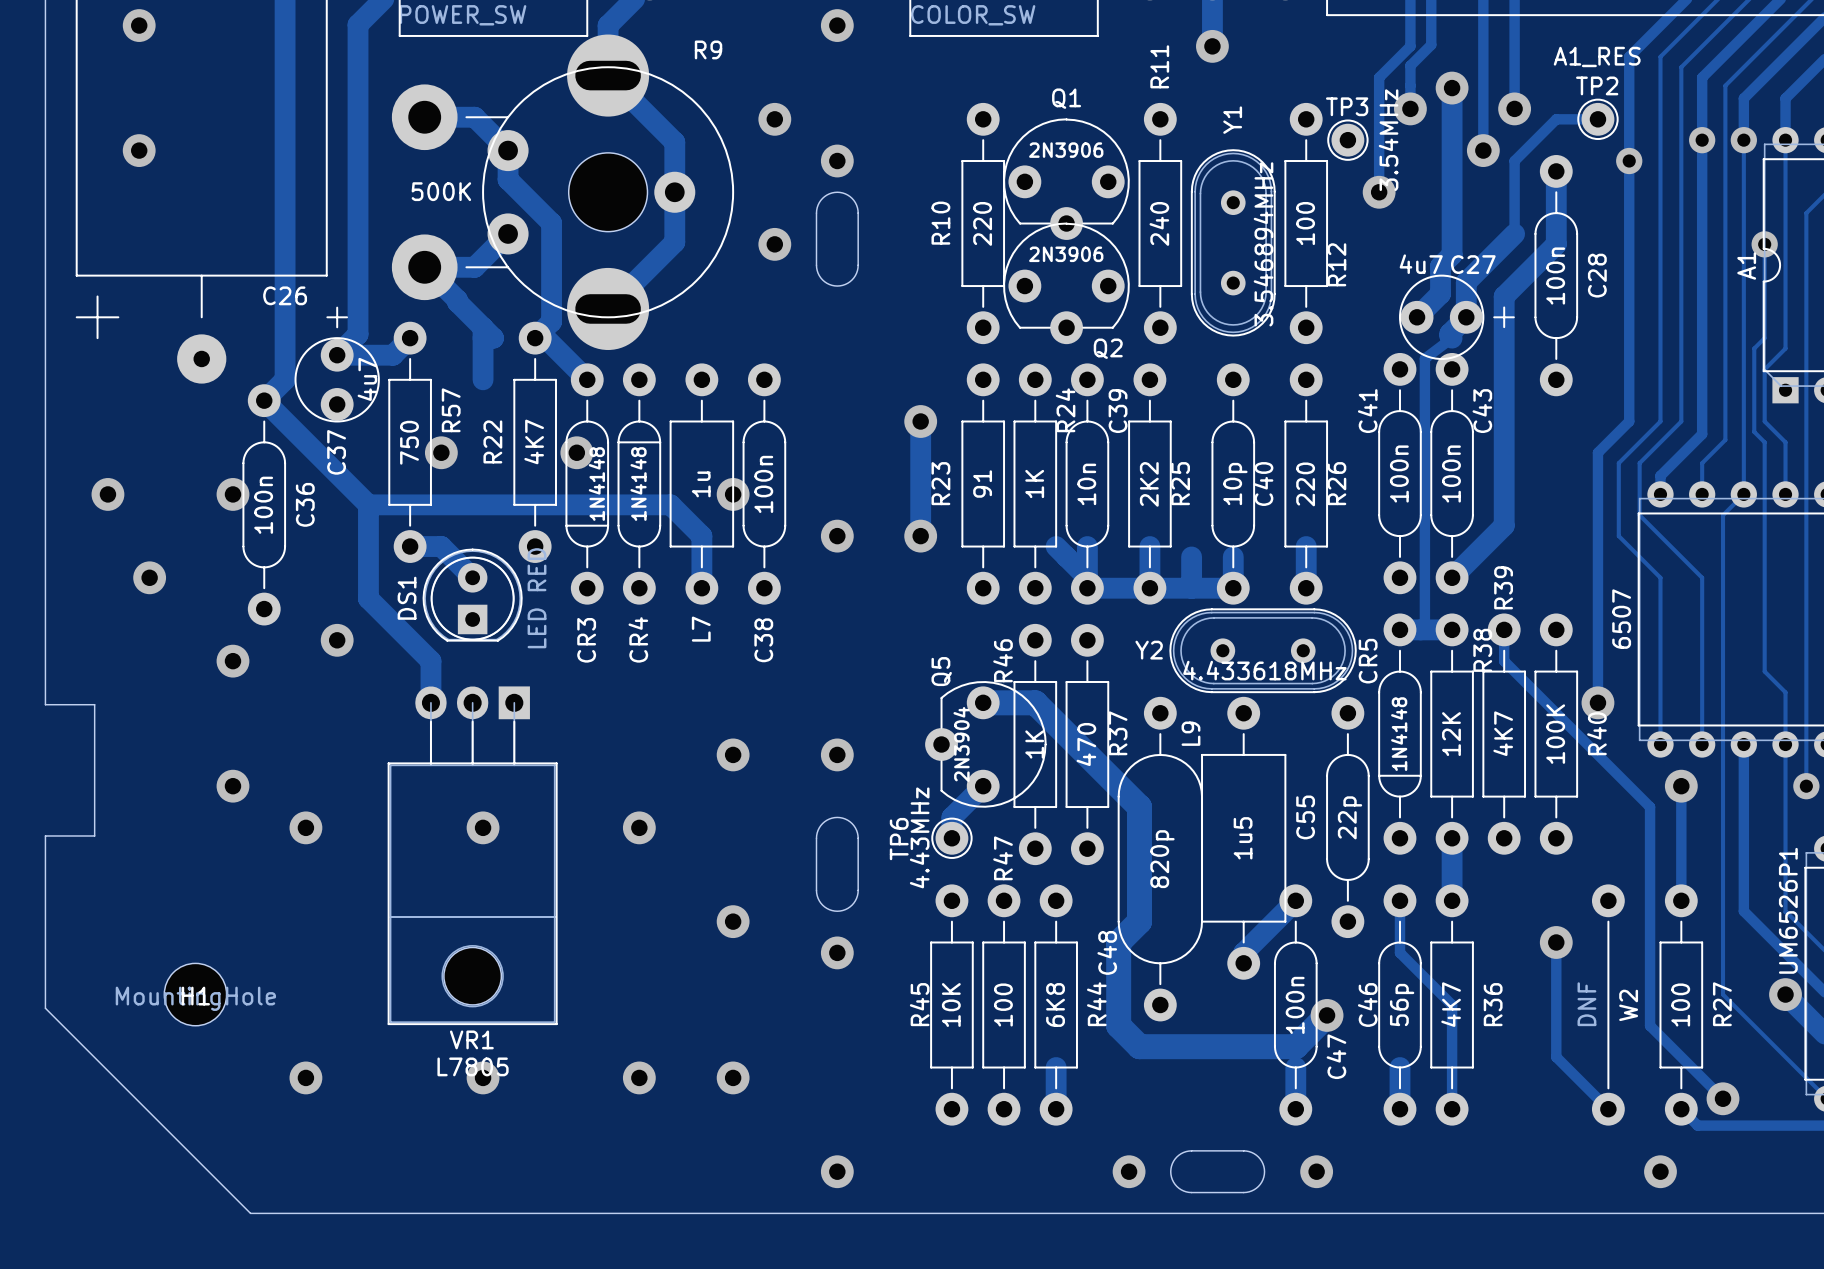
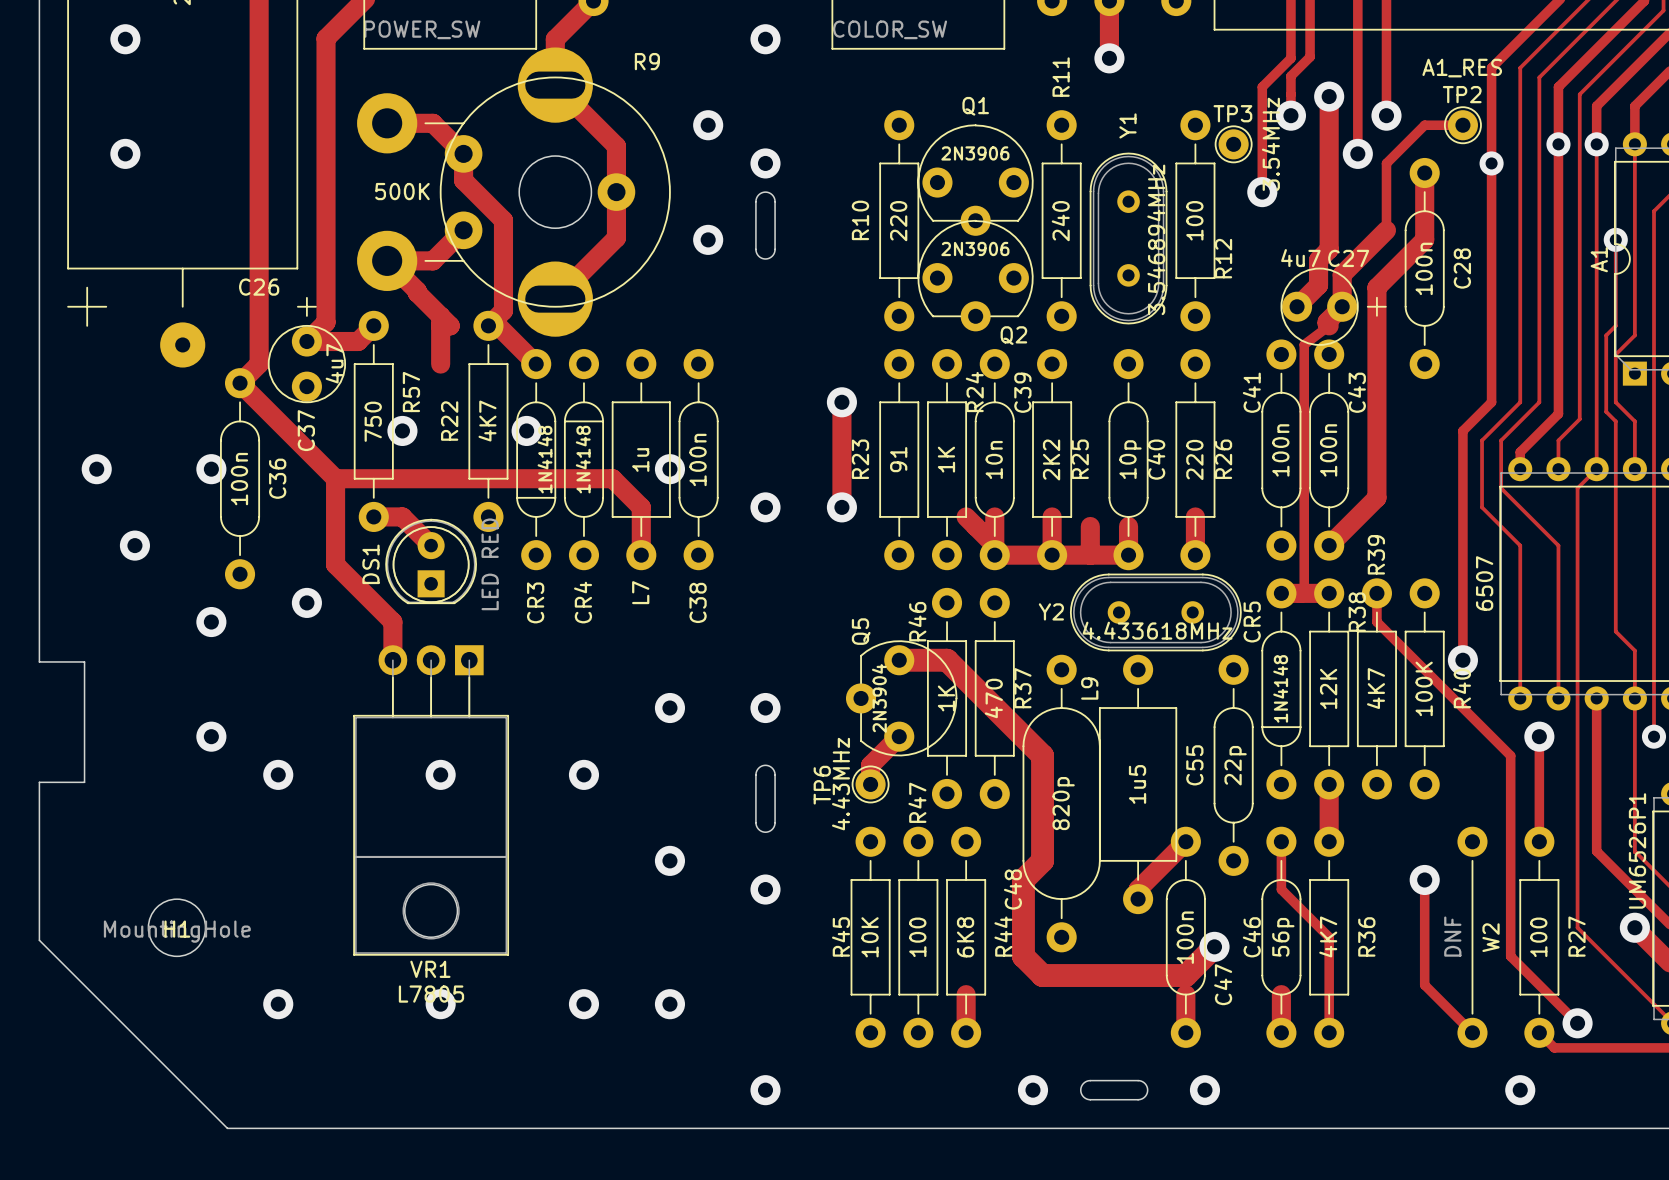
board edge: none -> (755, 201) (756, 253) (760, 257) (767, 258) (773, 255) (775, 249)
board edge: none -> (755, 201) (757, 195) (763, 192) (769, 192) (774, 198) (775, 249)
board edge: (816, 213) (818, 273) (822, 279) (829, 284) (837, 286) (845, 284) (853, 277) (857, 267) (856, 205) (847, 195) (834, 192) (826, 195) (820, 200) (816, 213) -> none
board edge: none -> (755, 774) (756, 826) (760, 830) (766, 832) (772, 829) (775, 822)
board edge: none -> (755, 774) (757, 769) (763, 765) (770, 766) (774, 771) (775, 822)
board edge: (816, 838) (818, 898) (822, 905) (829, 909) (837, 911) (845, 909) (853, 903) (857, 893) (856, 830) (852, 823) (845, 819) (831, 818) (820, 825) (816, 838) -> none
board edge: (1191, 1150) (1251, 1152) (1258, 1156) (1262, 1163) (1264, 1171) (1262, 1179) (1256, 1188) (1246, 1192) (1183, 1190) (1173, 1182) (1170, 1168) (1176, 1156) (1183, 1152) (1191, 1150) -> none
board edge: none -> (1138, 1080) (1086, 1081) (1082, 1085) (1081, 1092) (1084, 1097) (1090, 1099)
board edge: none -> (1138, 1080) (1143, 1082) (1147, 1087) (1146, 1094) (1141, 1098) (1090, 1099)

